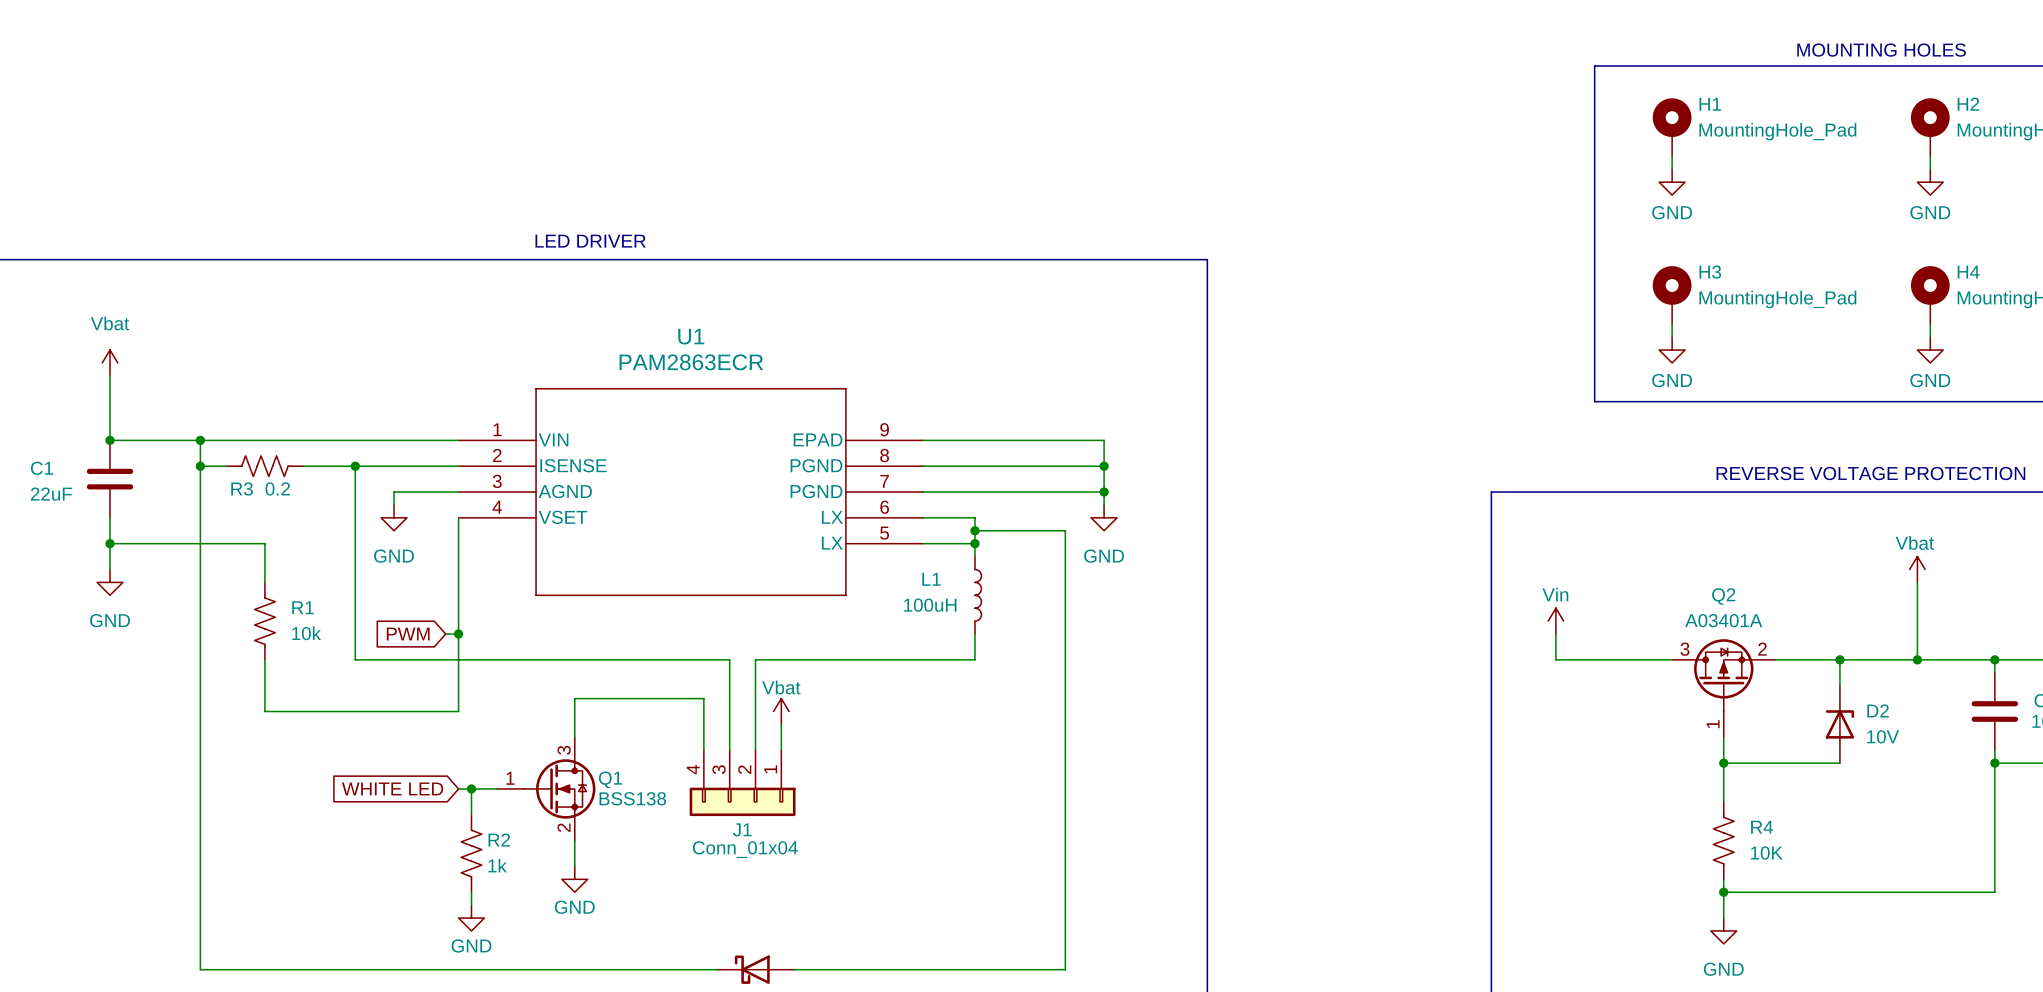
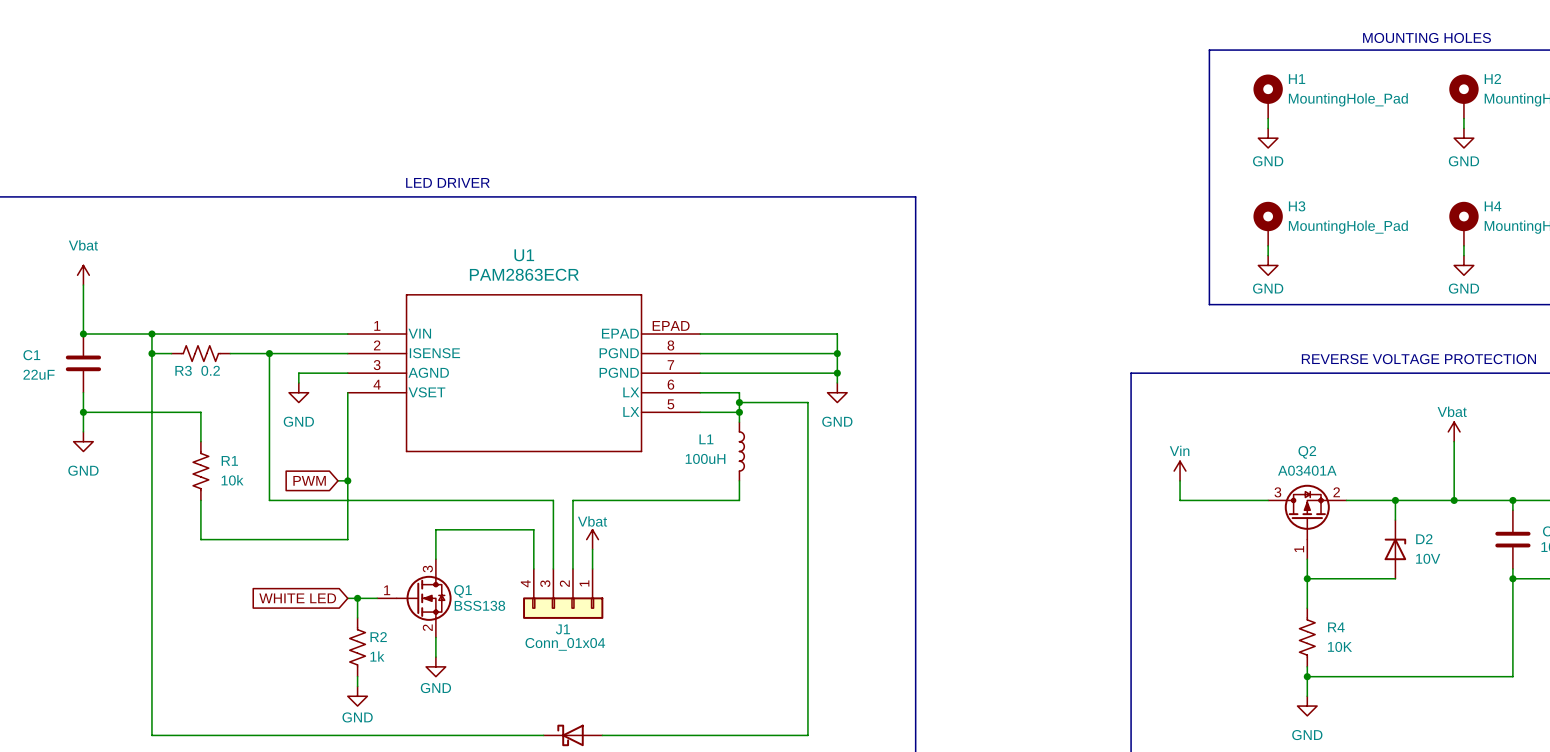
U1 pin number: 9 (884, 429) -> EPAD (671, 325)

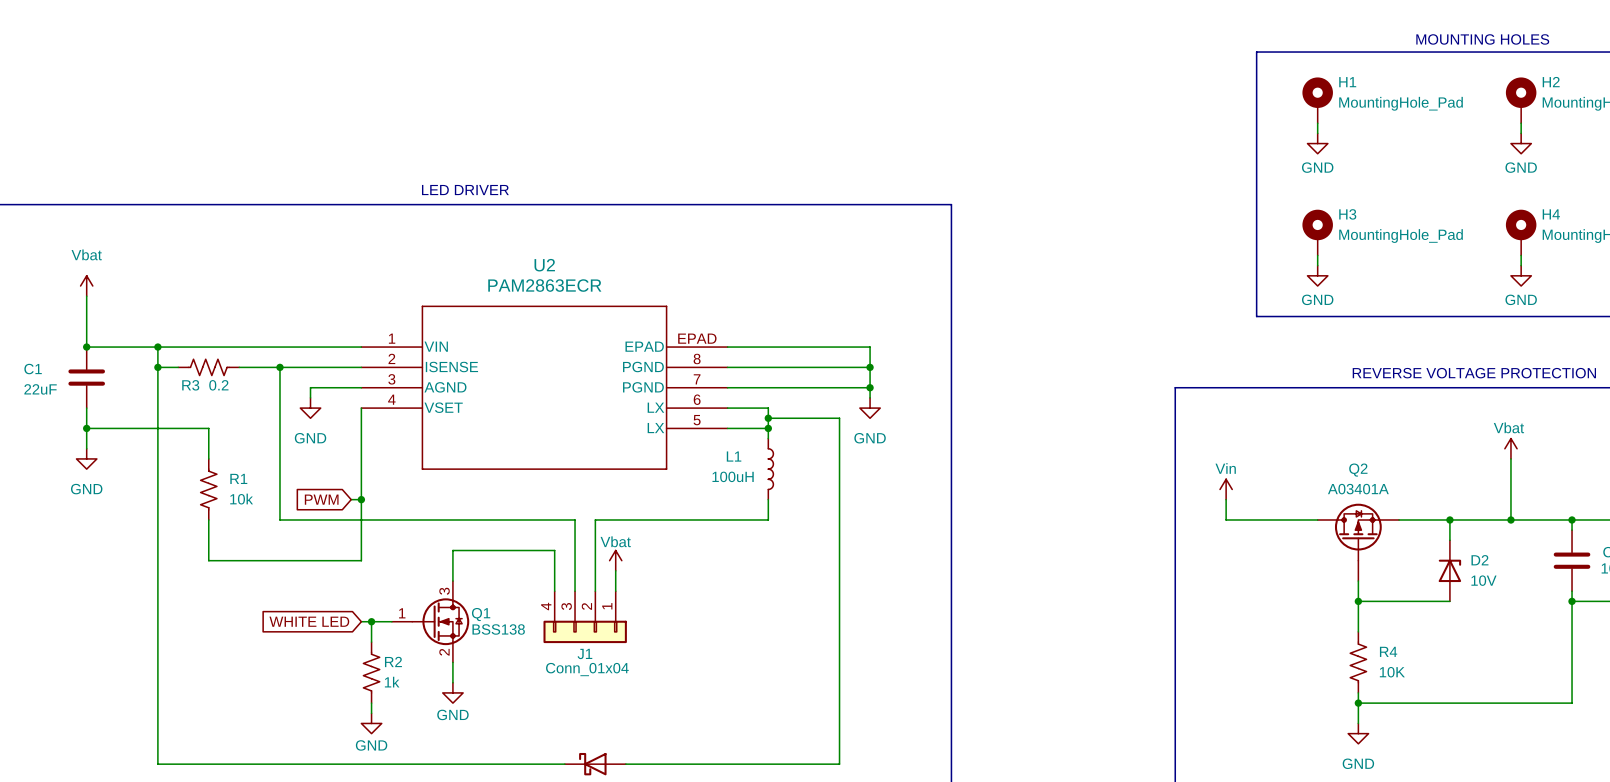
U1 name: U1 (524, 255) -> U2 (544, 265)
Q2 pin number: 3 (1277, 492) -> none
Q2 pin number: 2 (1336, 492) -> none
Q2 pin number: 1 (1299, 549) -> none

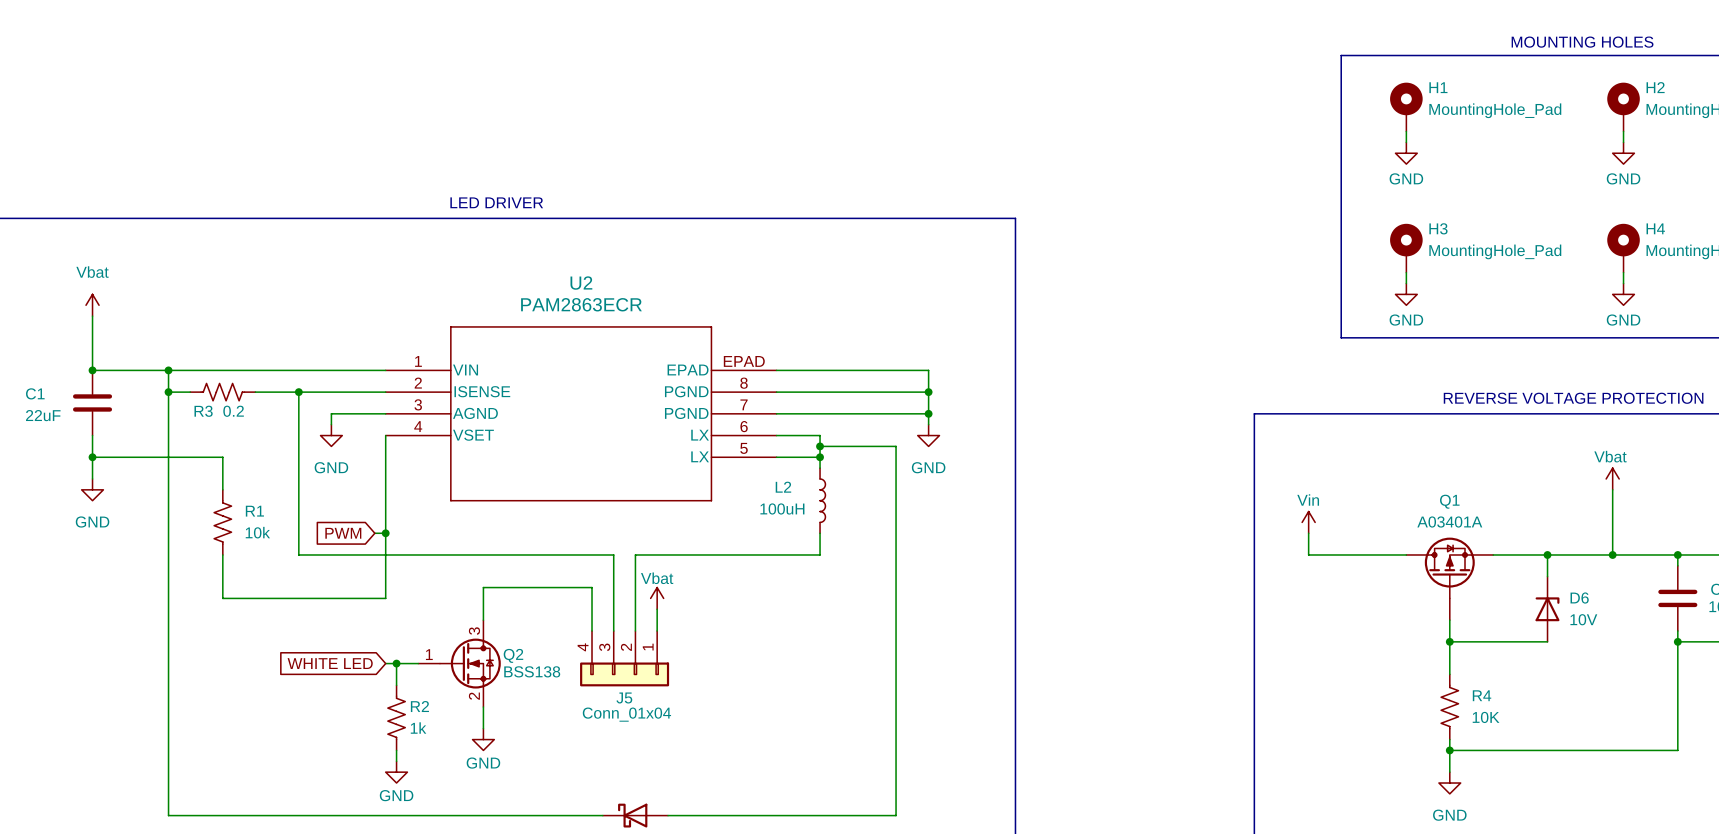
L1 name: L1 (734, 456) -> L2 (783, 487)
Q2 name: Q2 (1358, 470) -> Q1 (1449, 501)
D2 name: D2 (1479, 560) -> D6 (1579, 598)
Q1 name: Q1 (481, 614) -> Q2 (513, 655)
J1 name: J1 (584, 653) -> J5 (624, 697)

